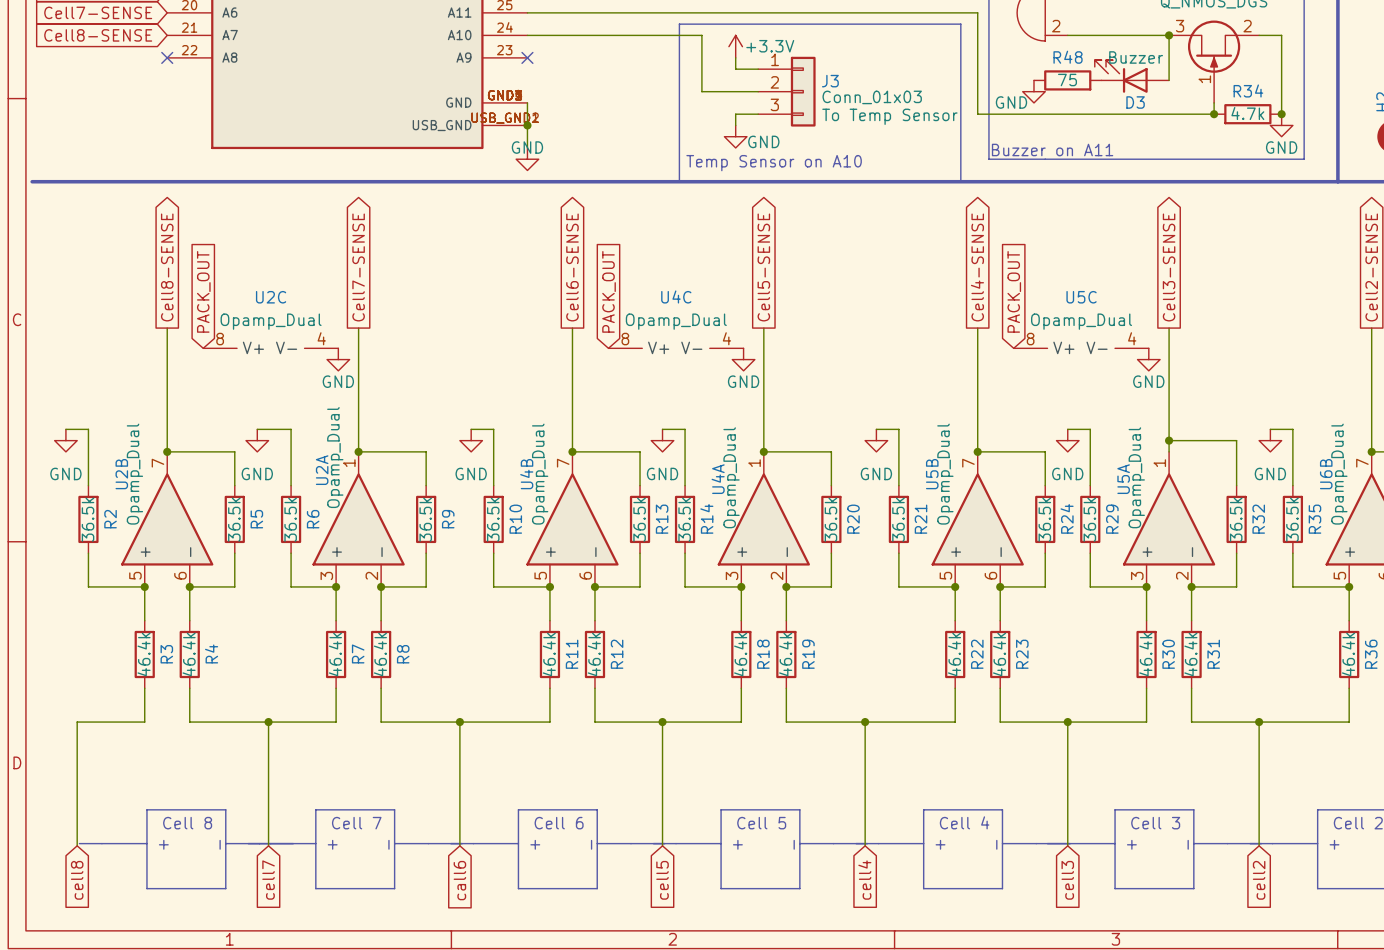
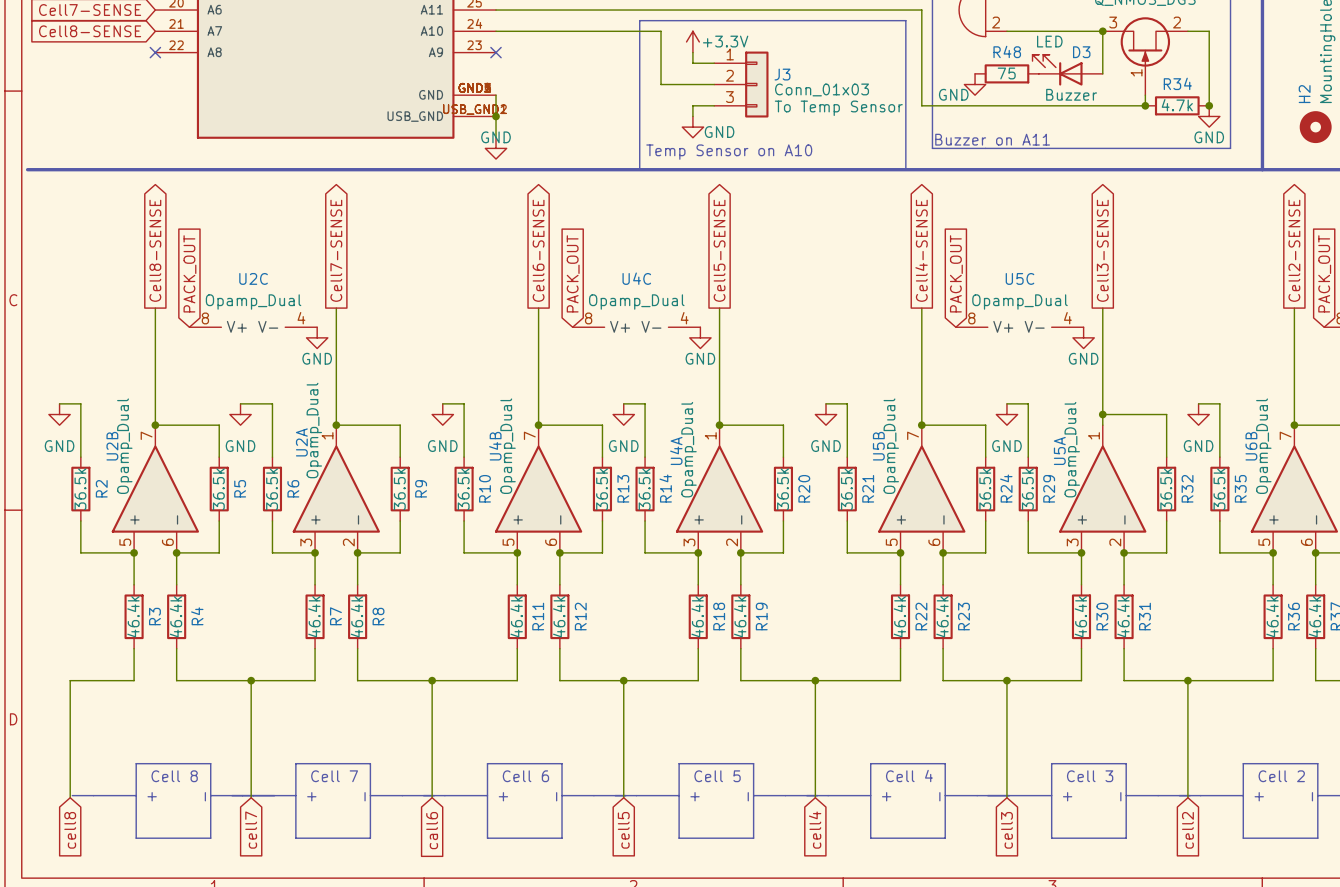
D3 value: Buzzer (1136, 57) -> LED (1049, 41)
D3 name position: D3 (1135, 102) -> D3 (1081, 52)
D3 text: none -> Buzzer (1071, 94)

